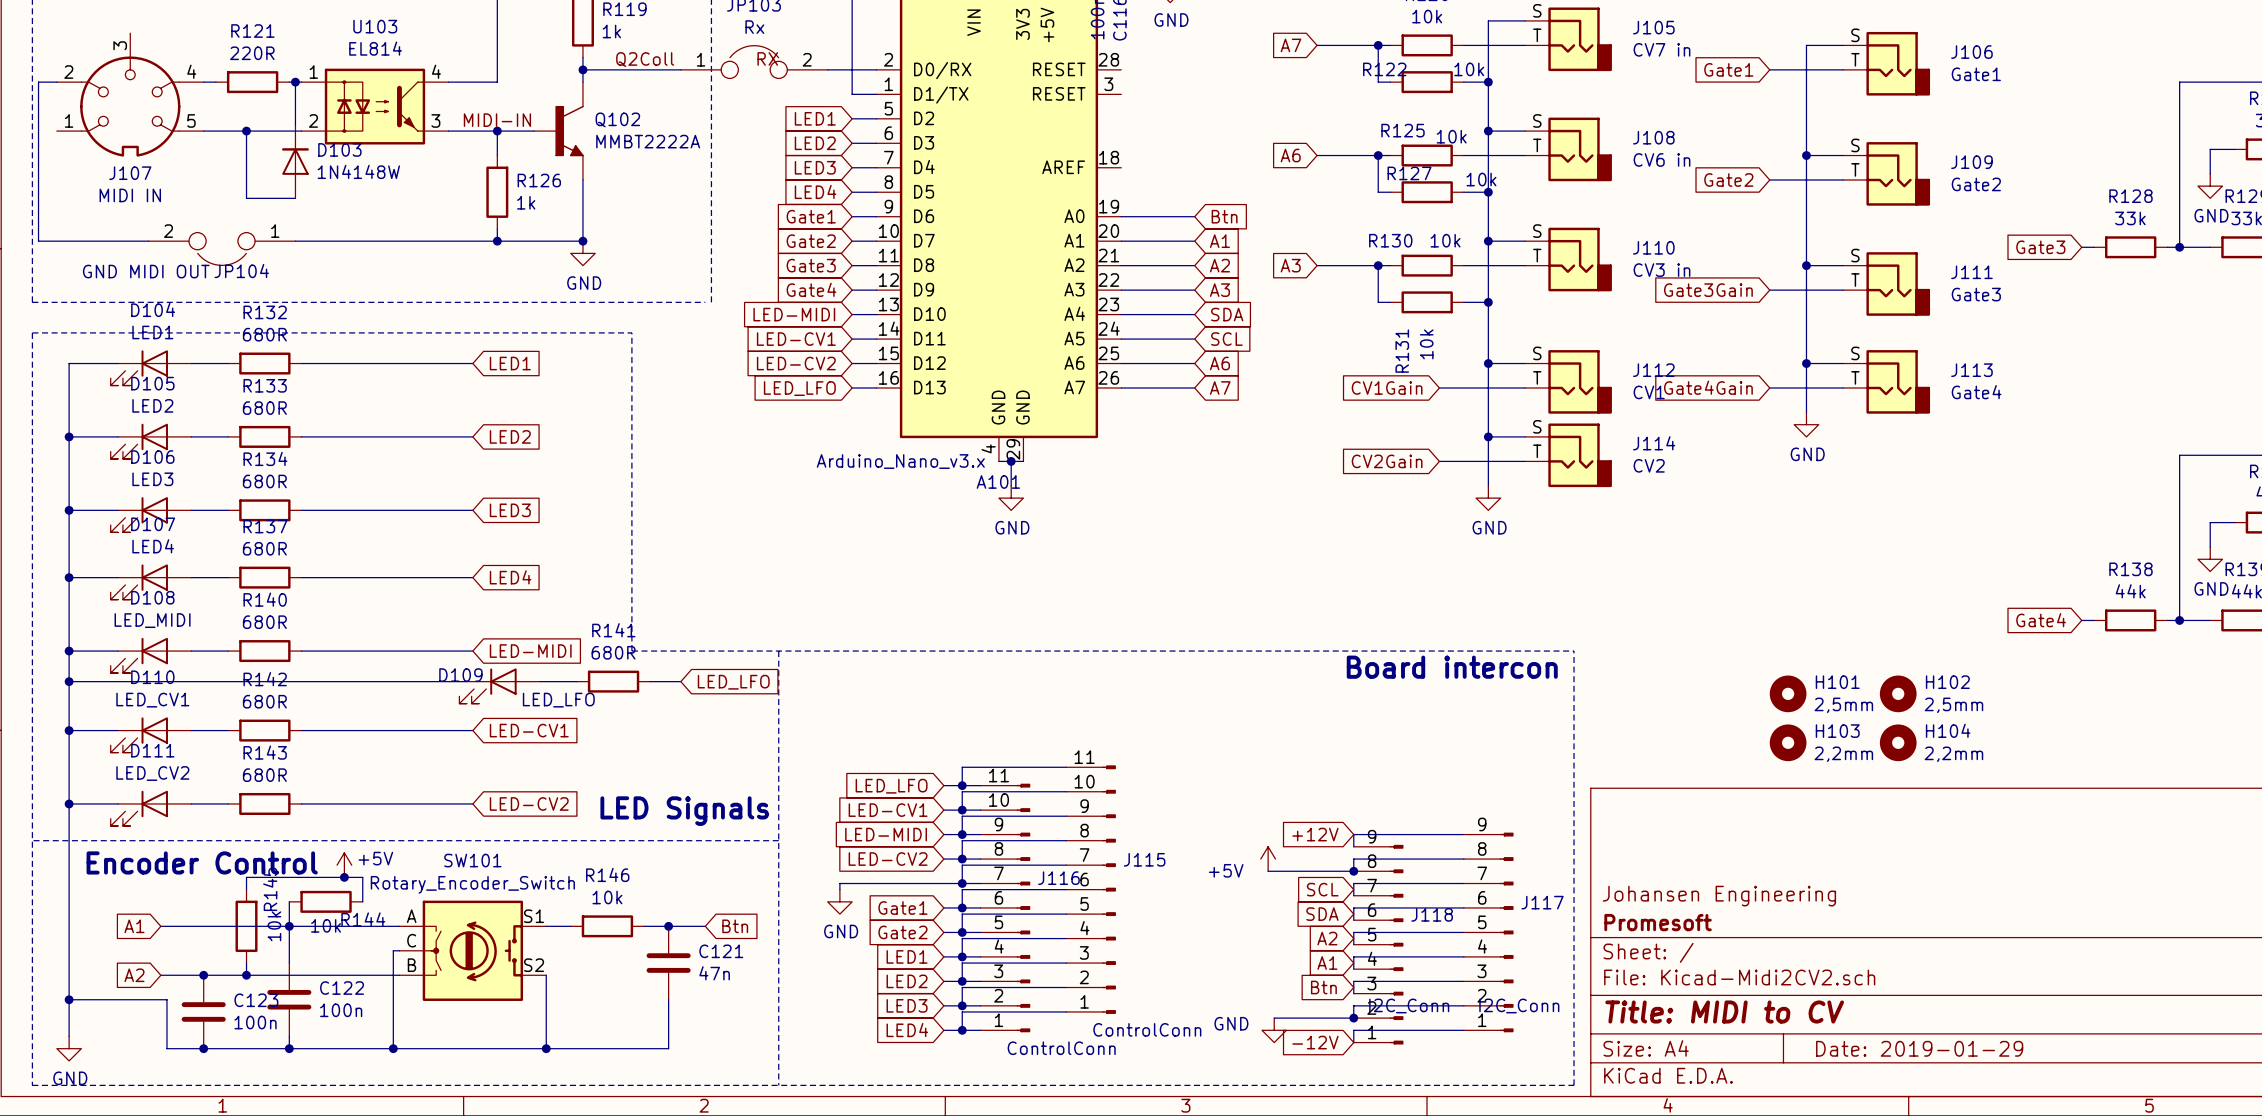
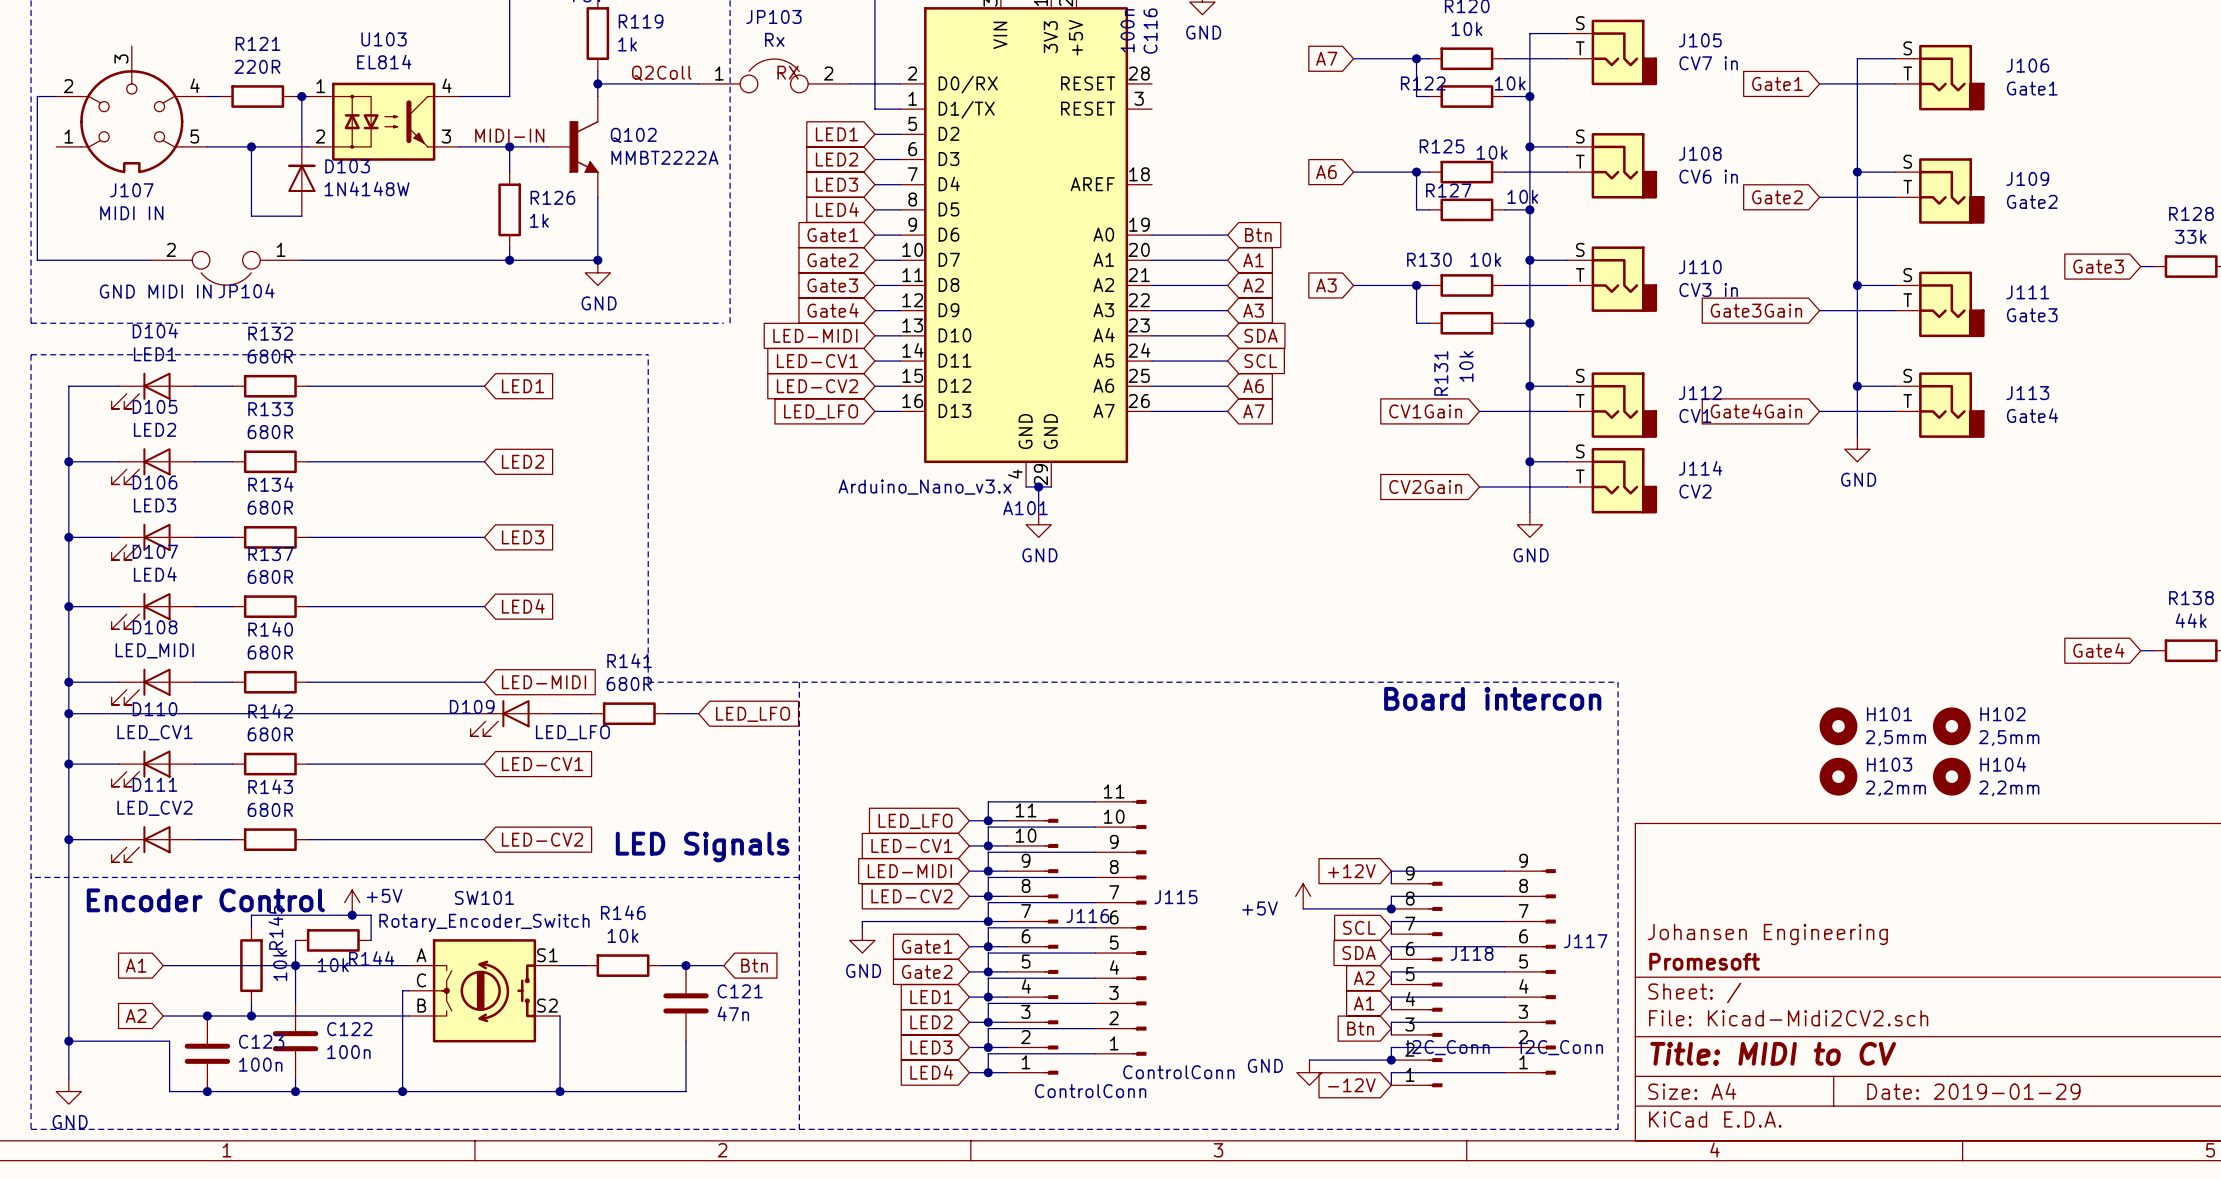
JP104 value: GND MIDI OUT (146, 271) -> GND MIDI IN (155, 291)

